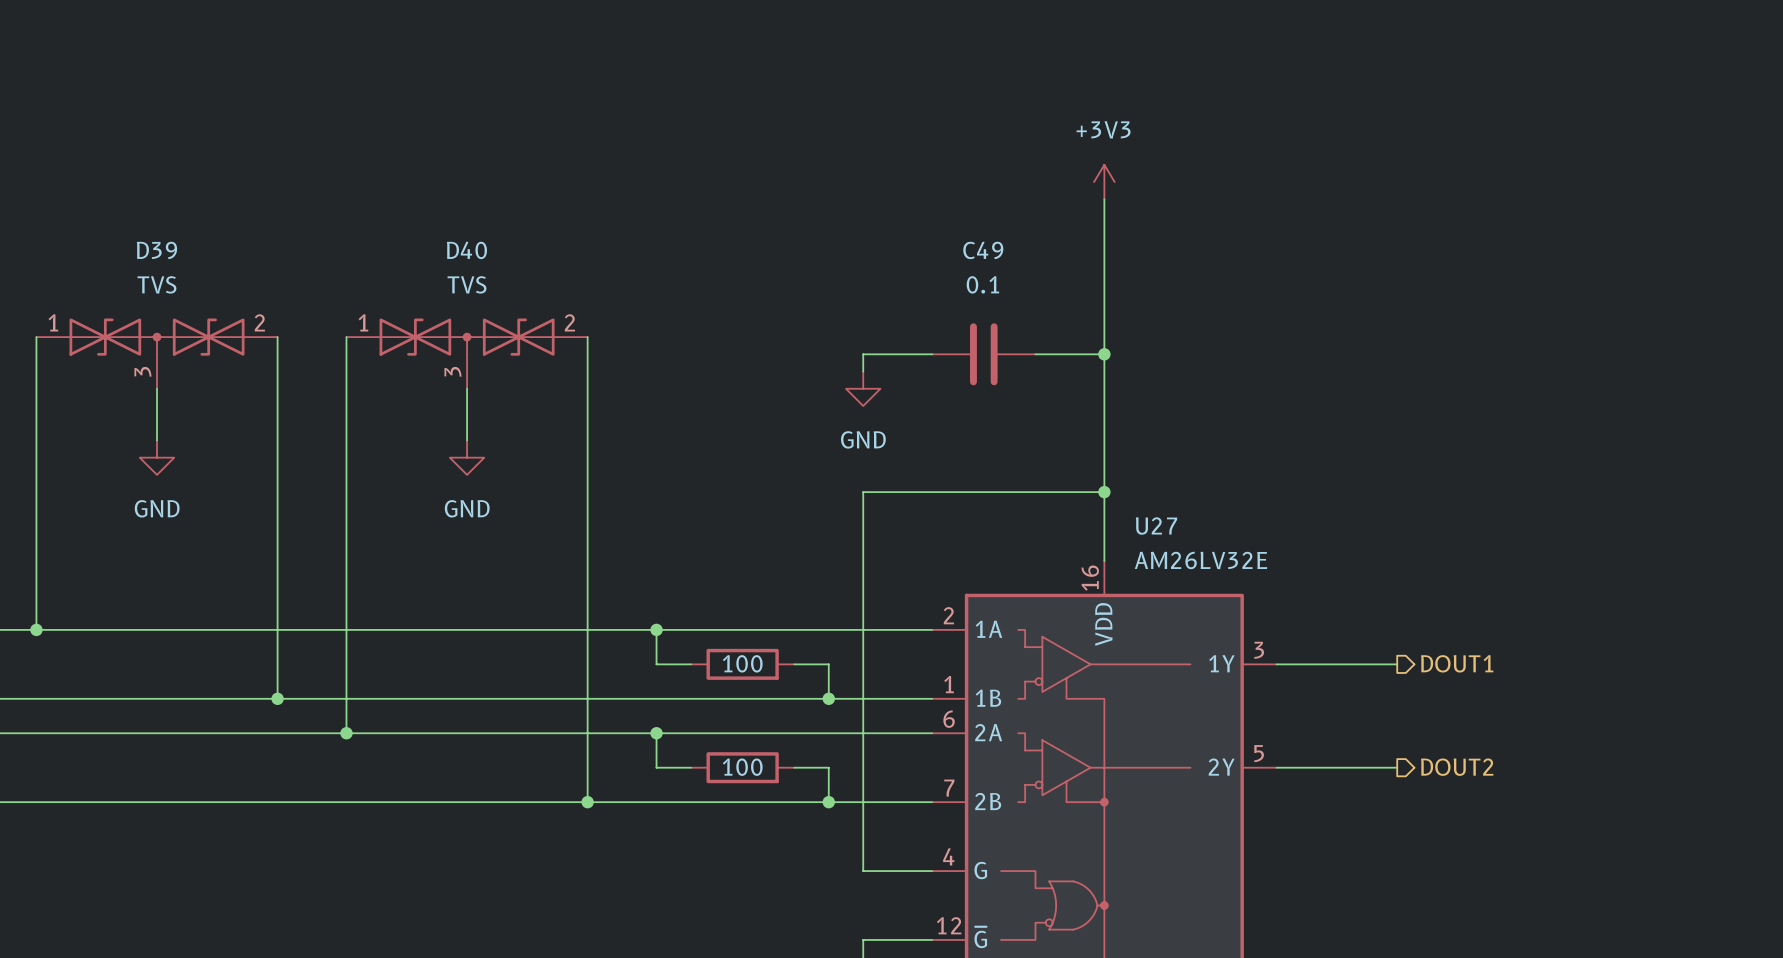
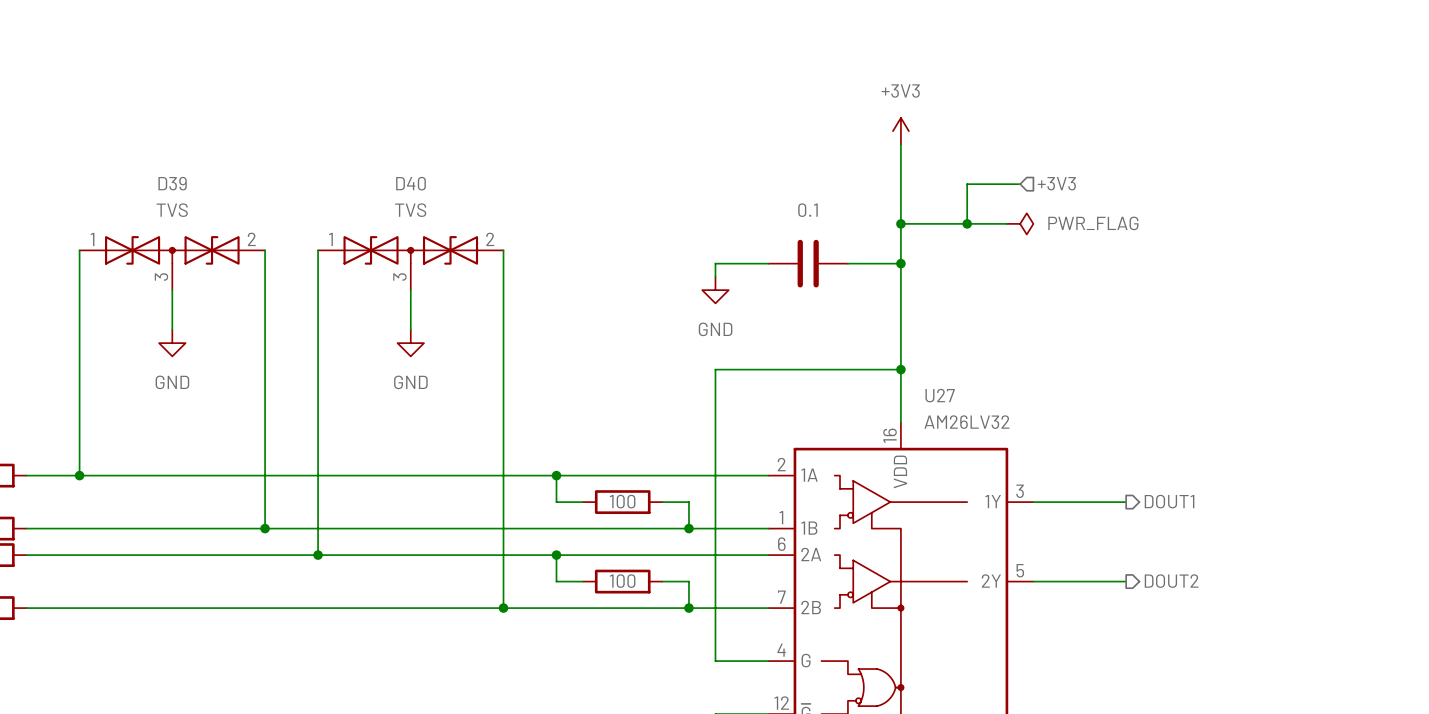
C49 name: C49 (983, 250) -> none
wire: none -> (1020, 184) (967, 184) (967, 223)
hierarchical label: none -> +3V3 (1056, 183)
wire: none -> (900, 223) (1006, 223)
junction: none -> (900, 223)
junction: none -> (967, 223)
power symbol: none -> PWR_FLAG (1020, 223)
U27 value: AM26LV32E (1201, 560) -> AM26LV32 (966, 422)

